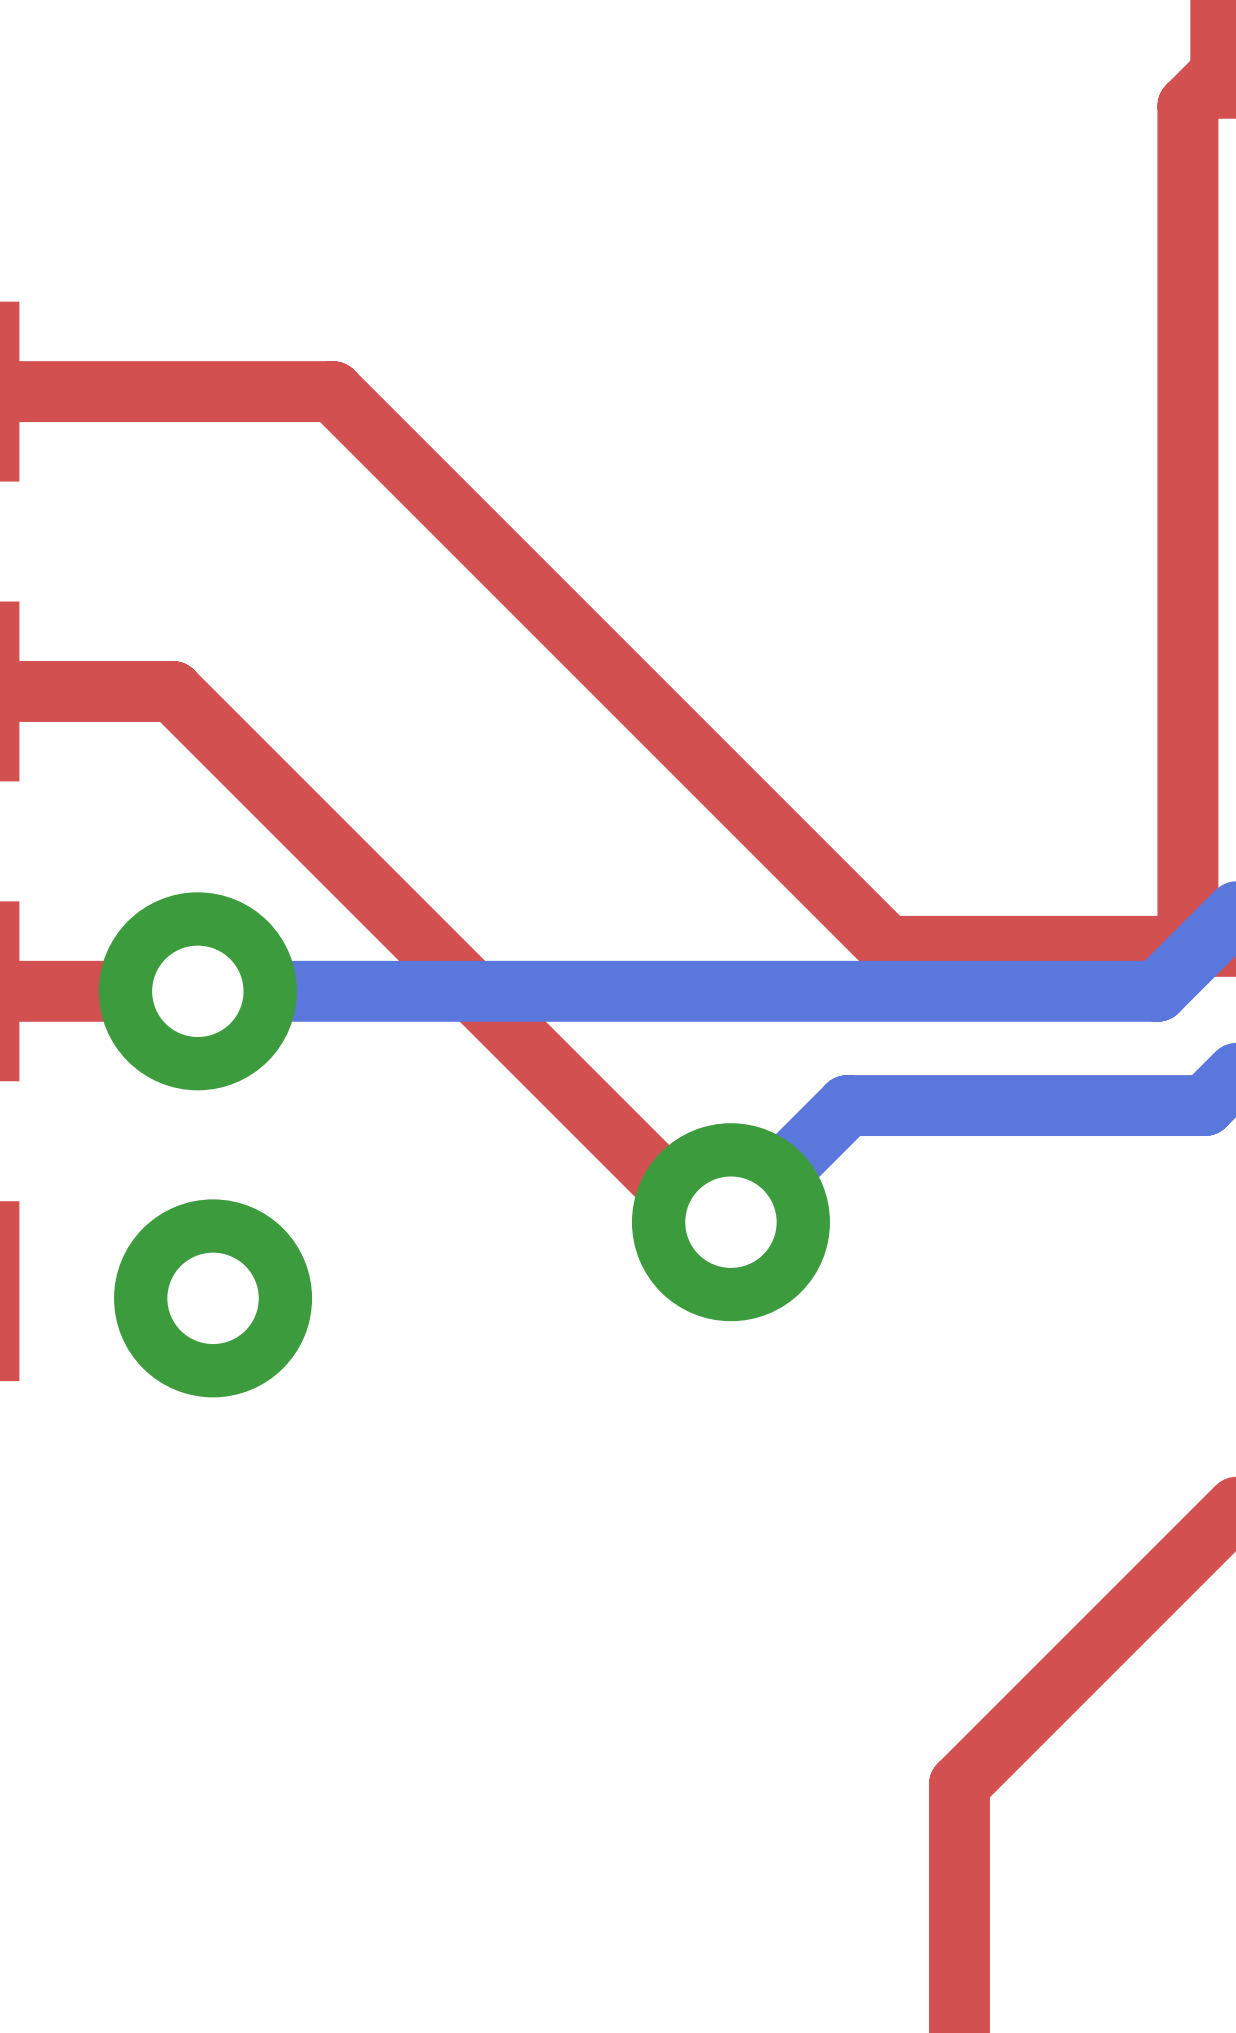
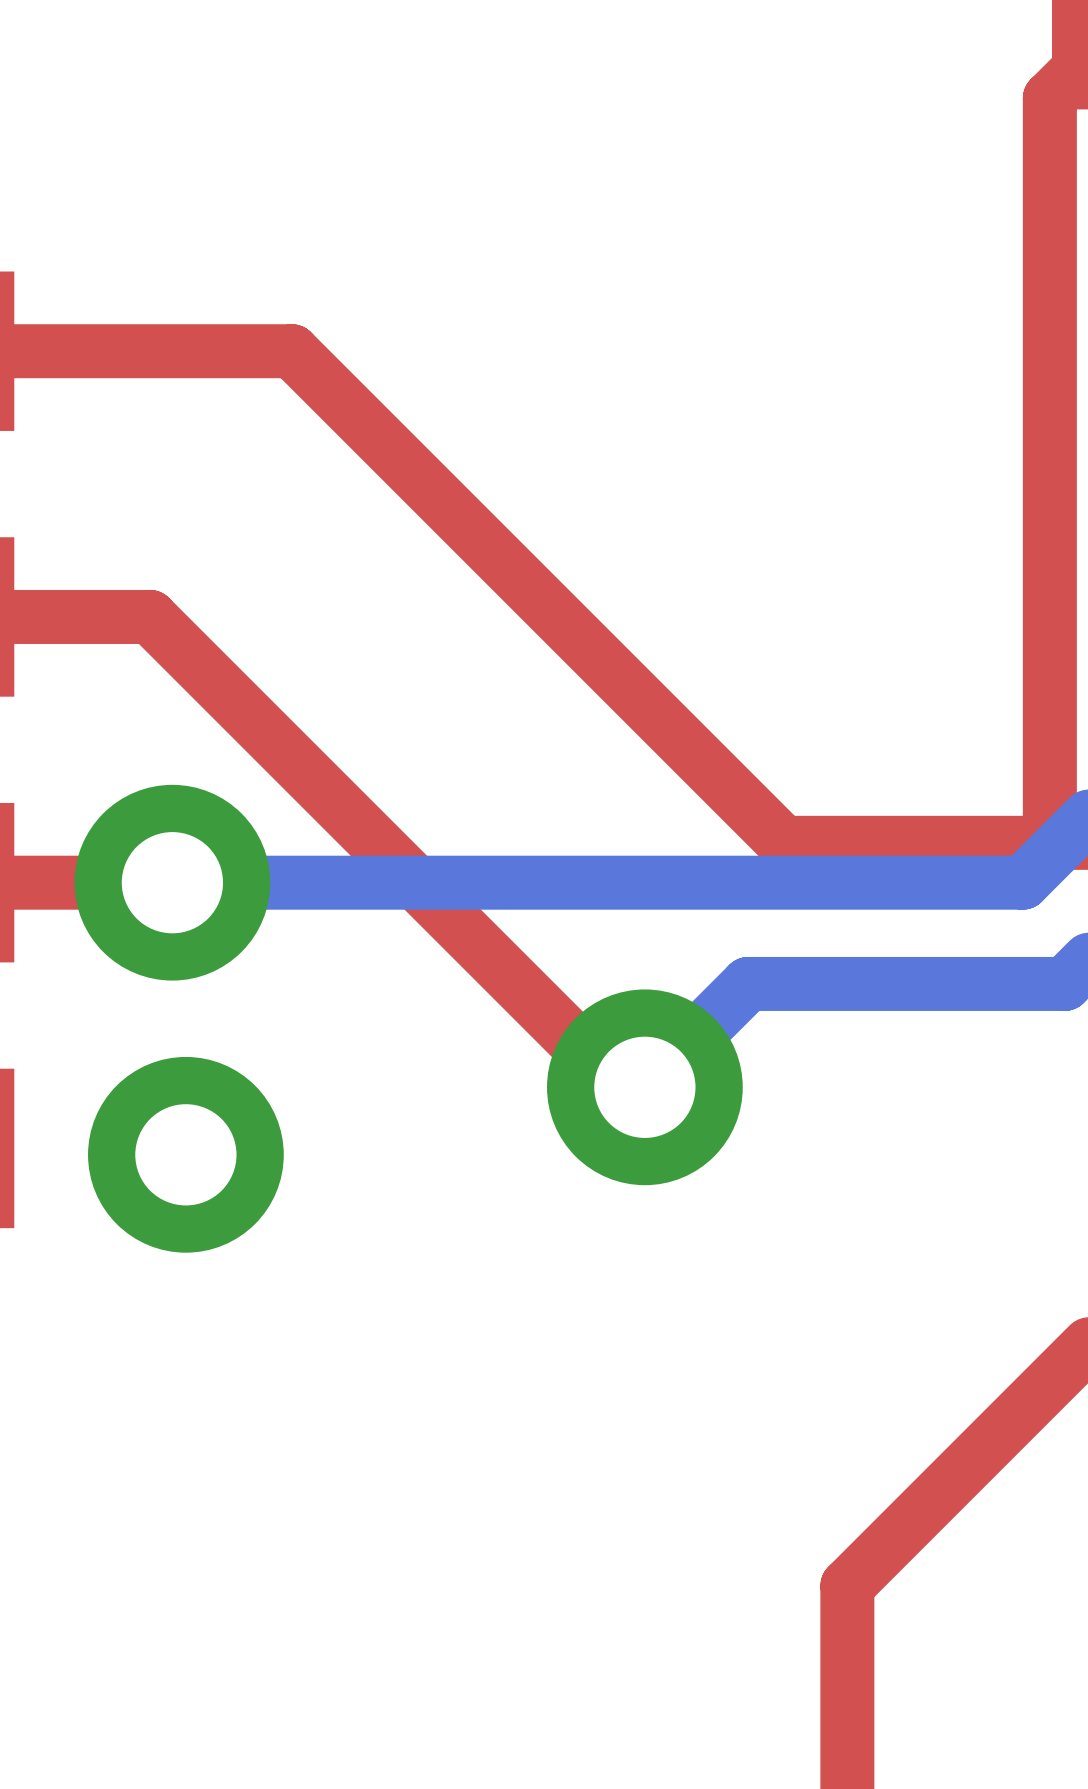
via size: [98, 892, 297, 1091] -> [74, 784, 271, 981]
via size: [631, 1123, 830, 1322] -> [547, 989, 743, 1186]
via size: [114, 1199, 313, 1398] -> [88, 1056, 284, 1253]

